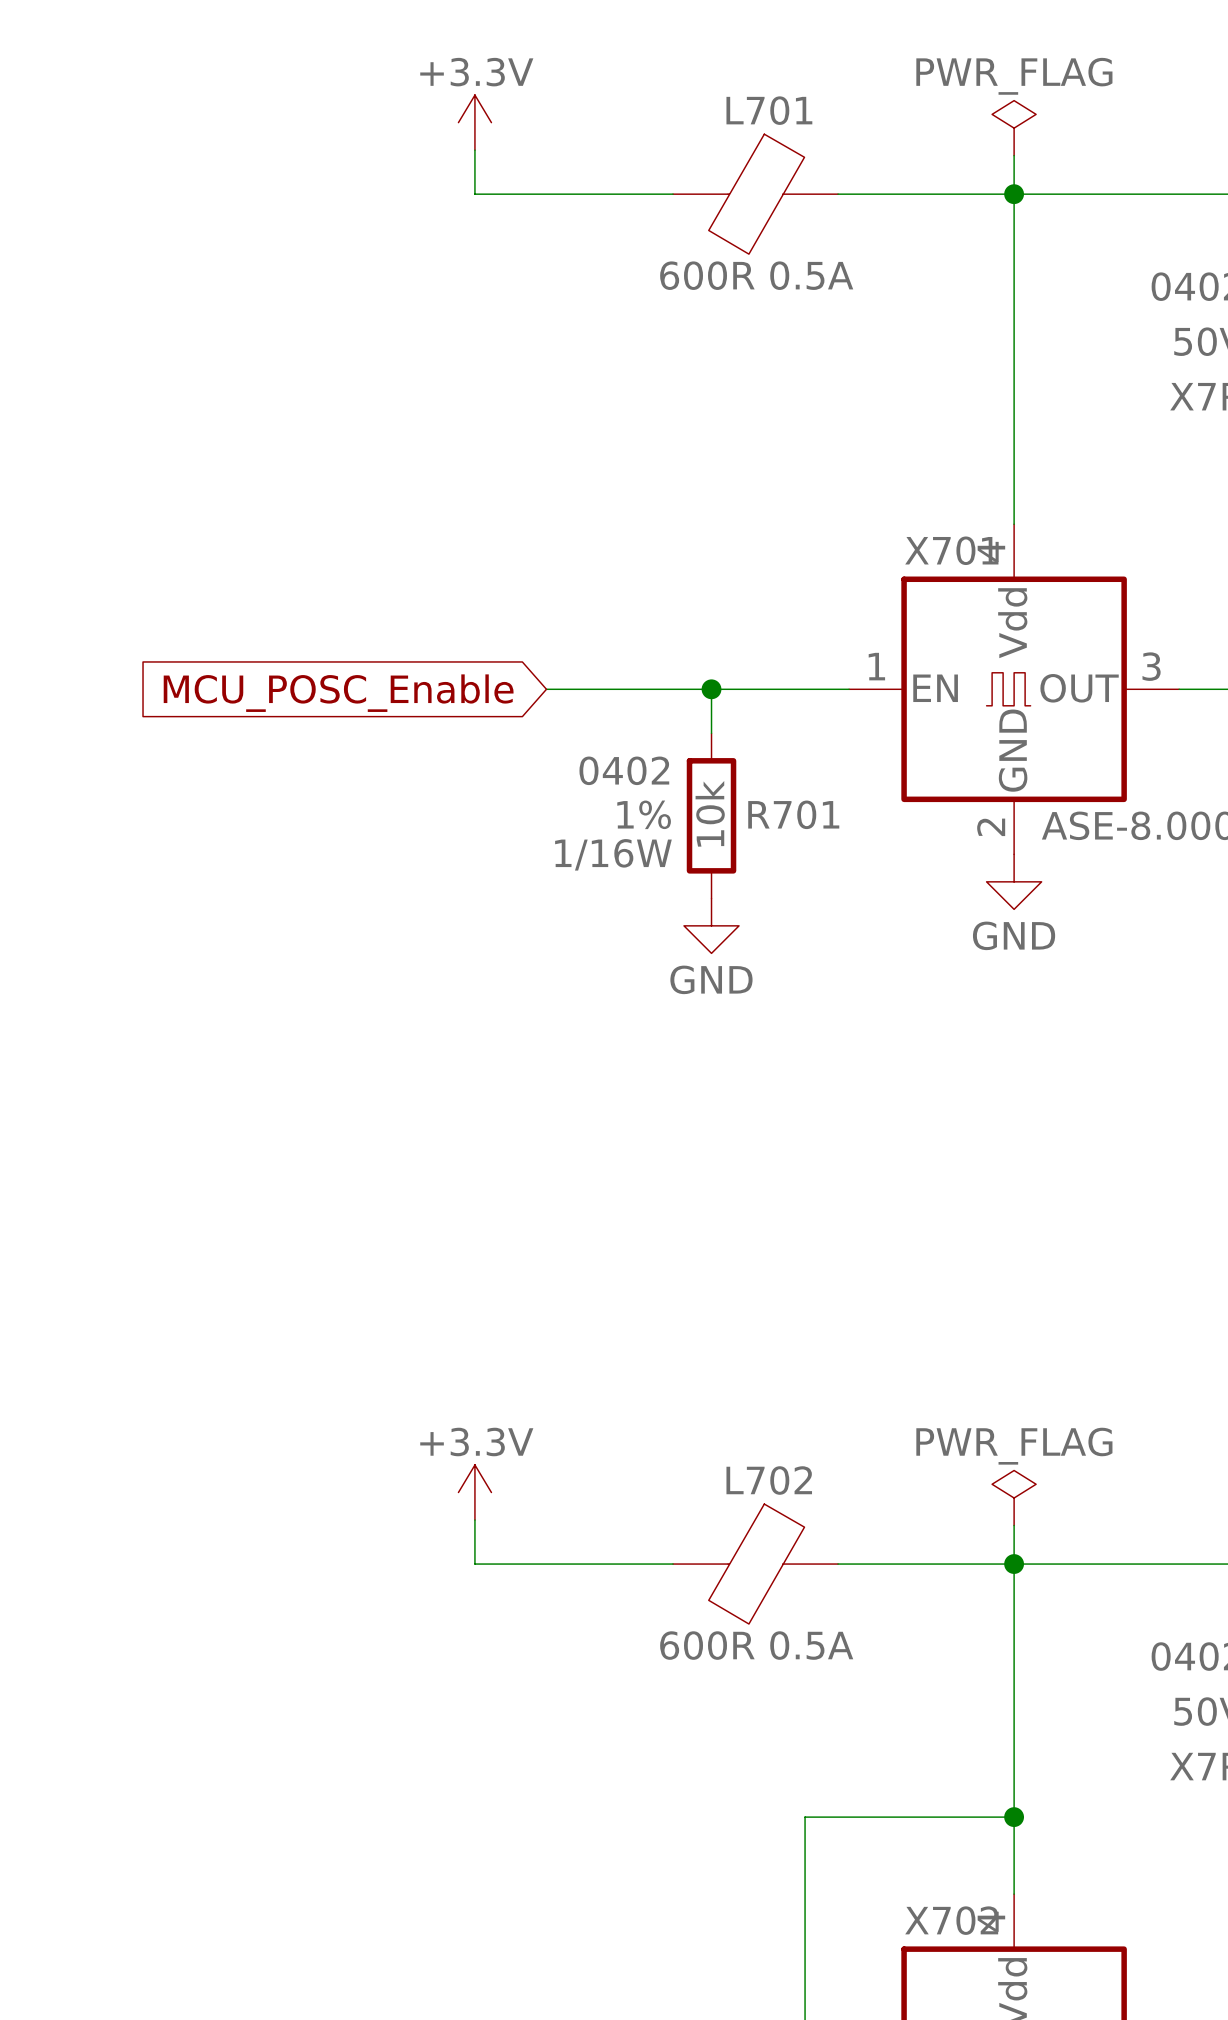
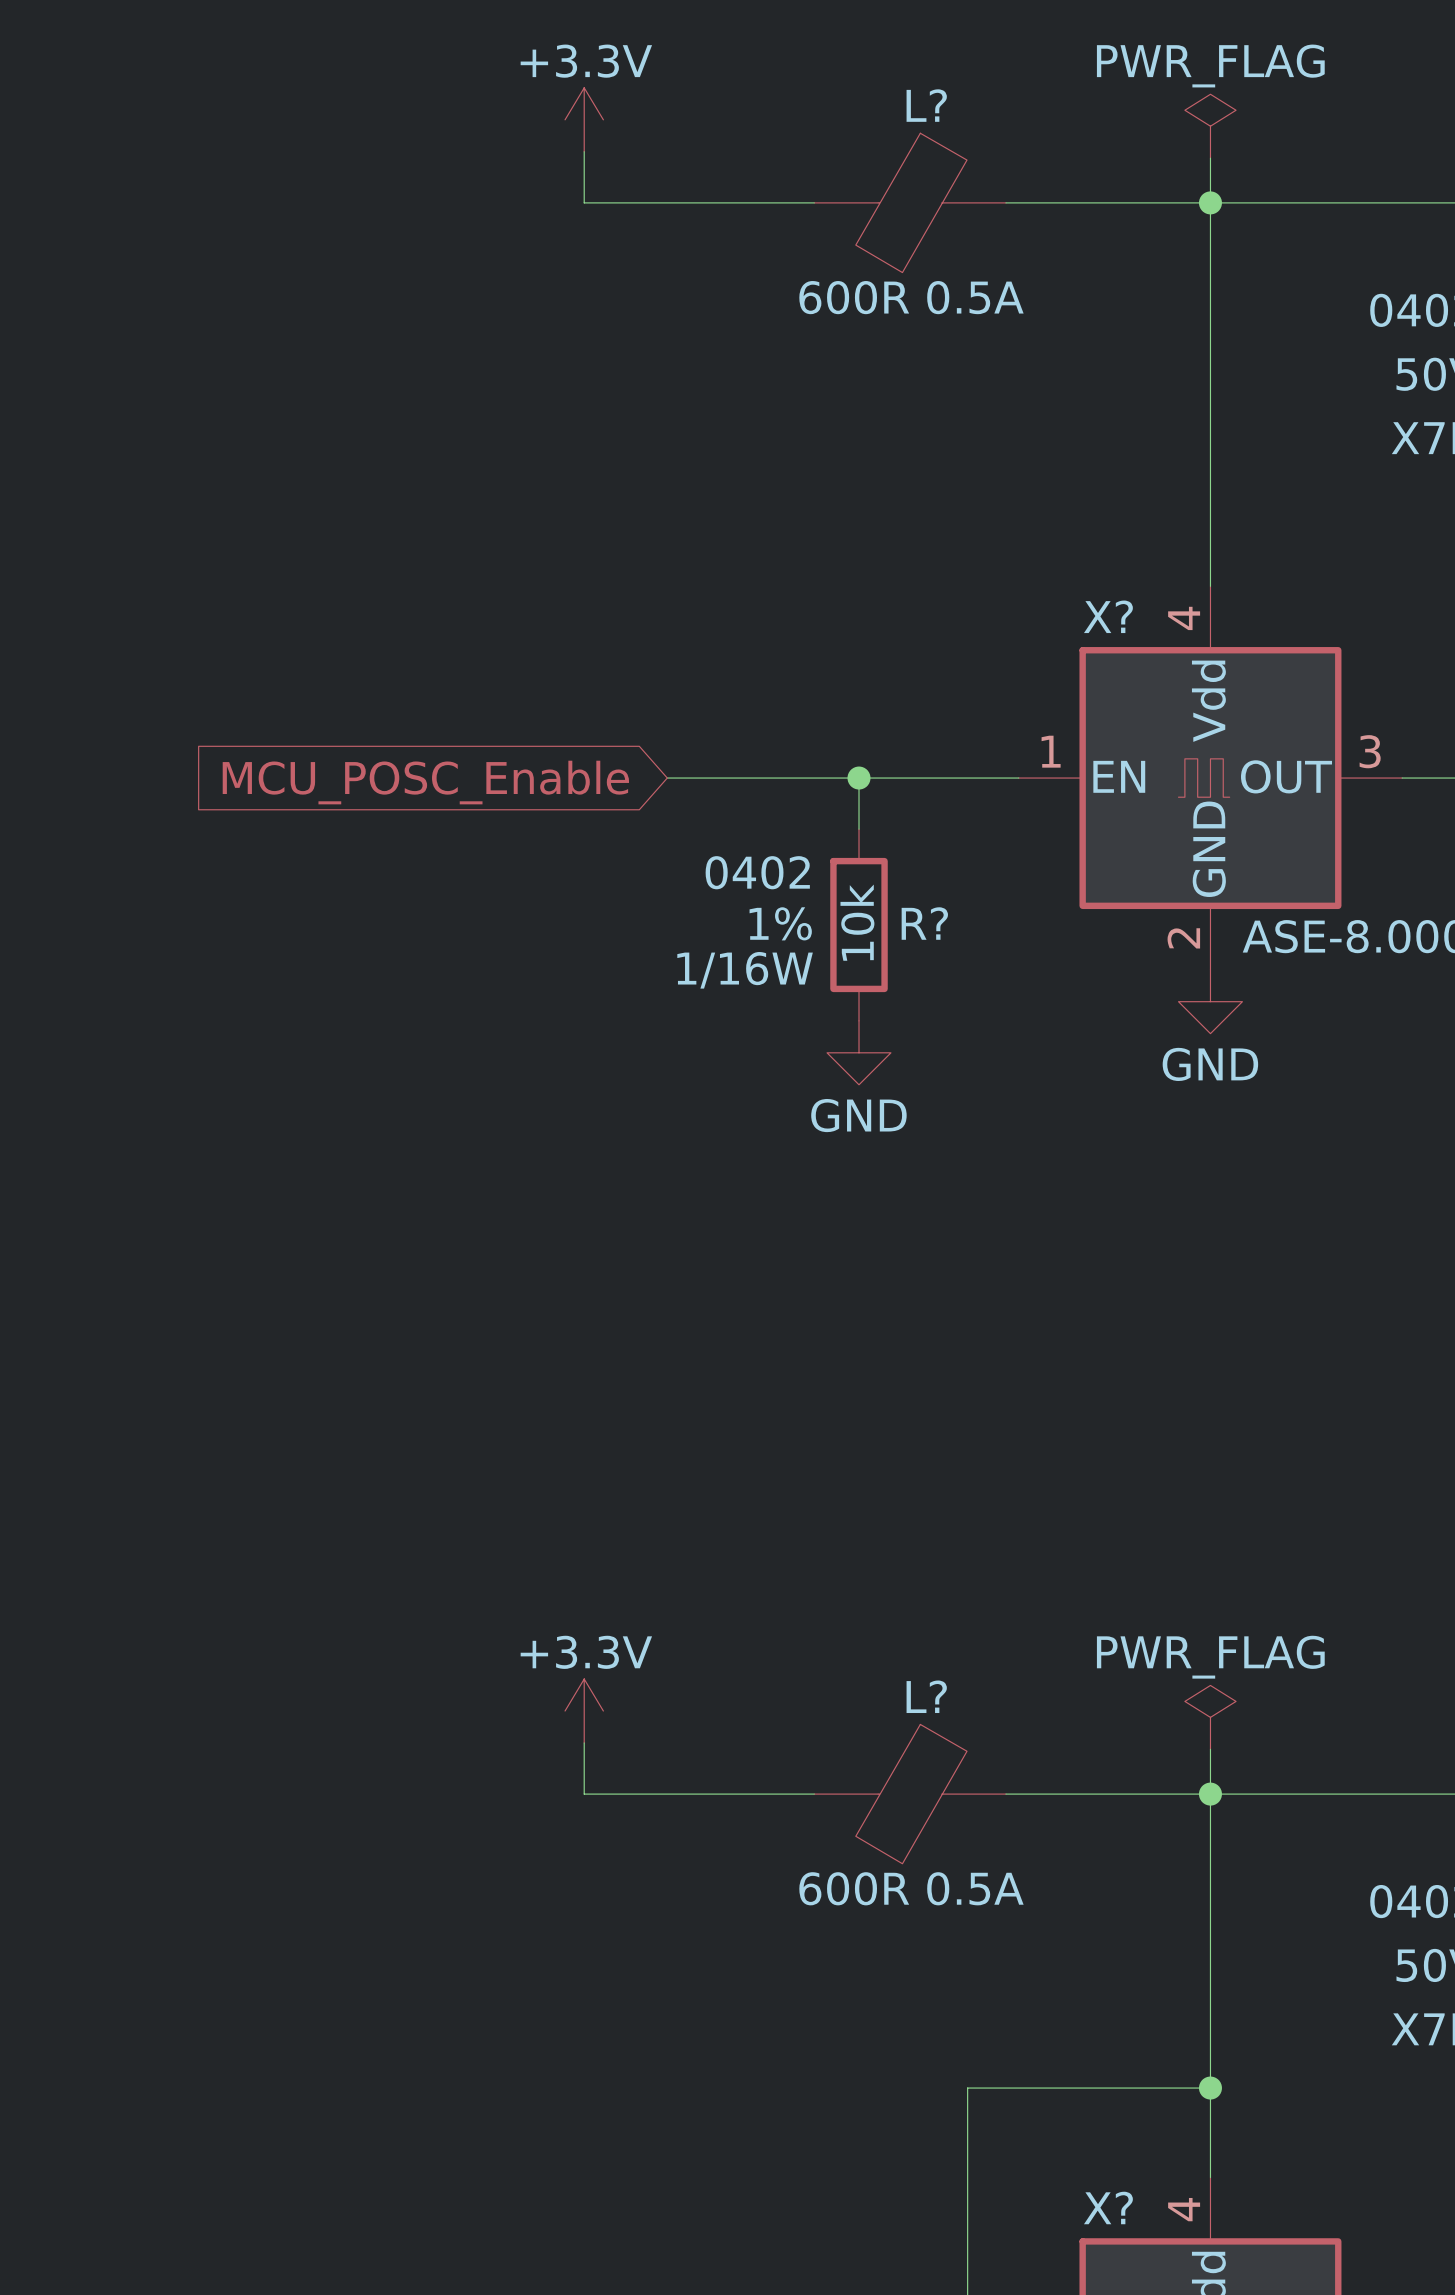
L701 name: L701 (769, 110) -> L? (926, 105)
X701 name: X701 (951, 550) -> X? (1108, 616)
R701 name: R701 (793, 814) -> R? (924, 923)
L702 name: L702 (769, 1480) -> L? (926, 1696)
X702 name: X702 (951, 1920) -> X? (1108, 2207)

